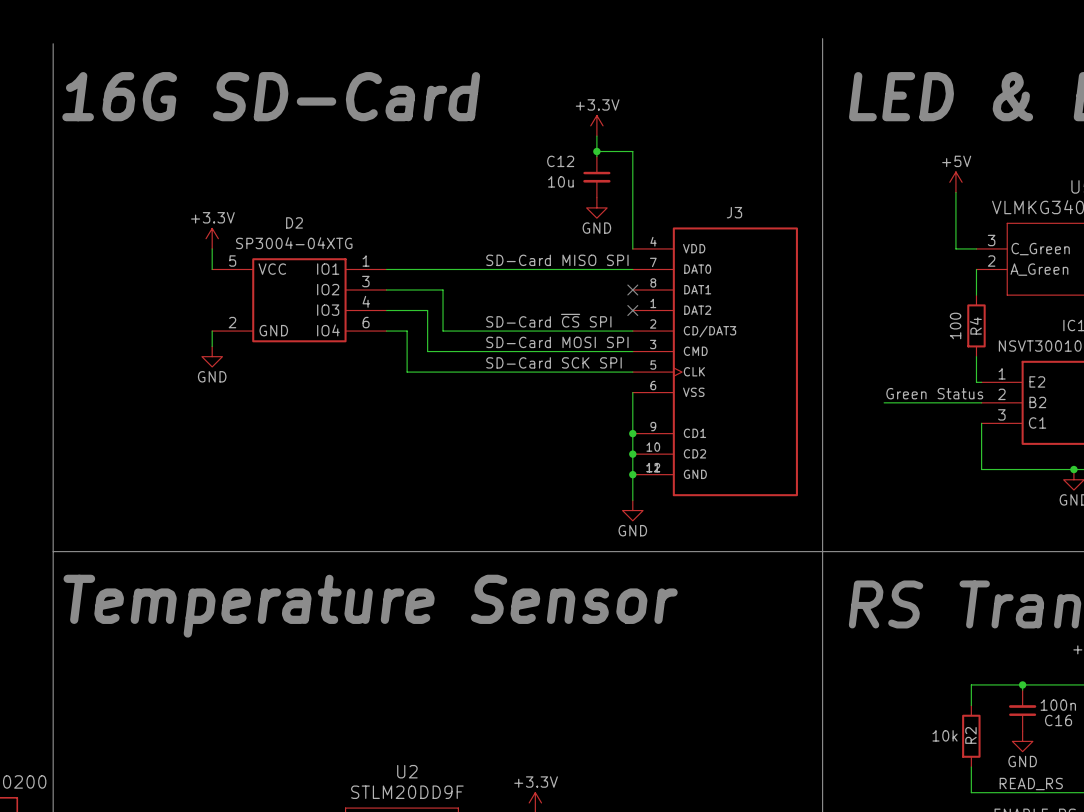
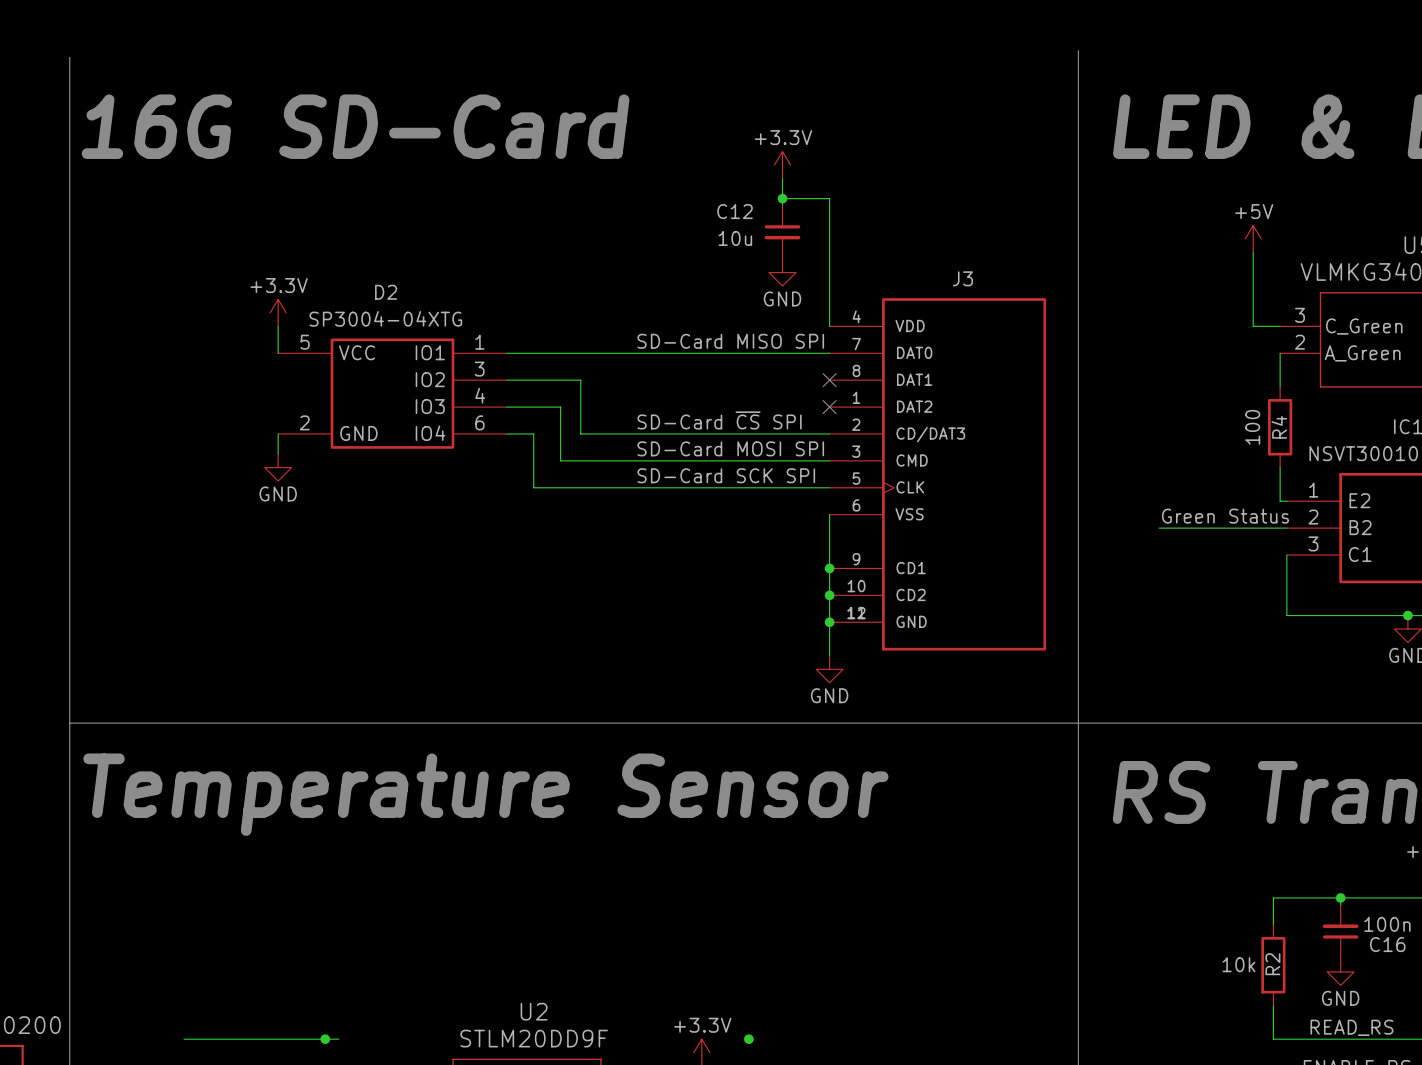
wire: none -> (184, 1039) (338, 1039)
junction: none -> (325, 1039)
junction: none -> (748, 1039)

